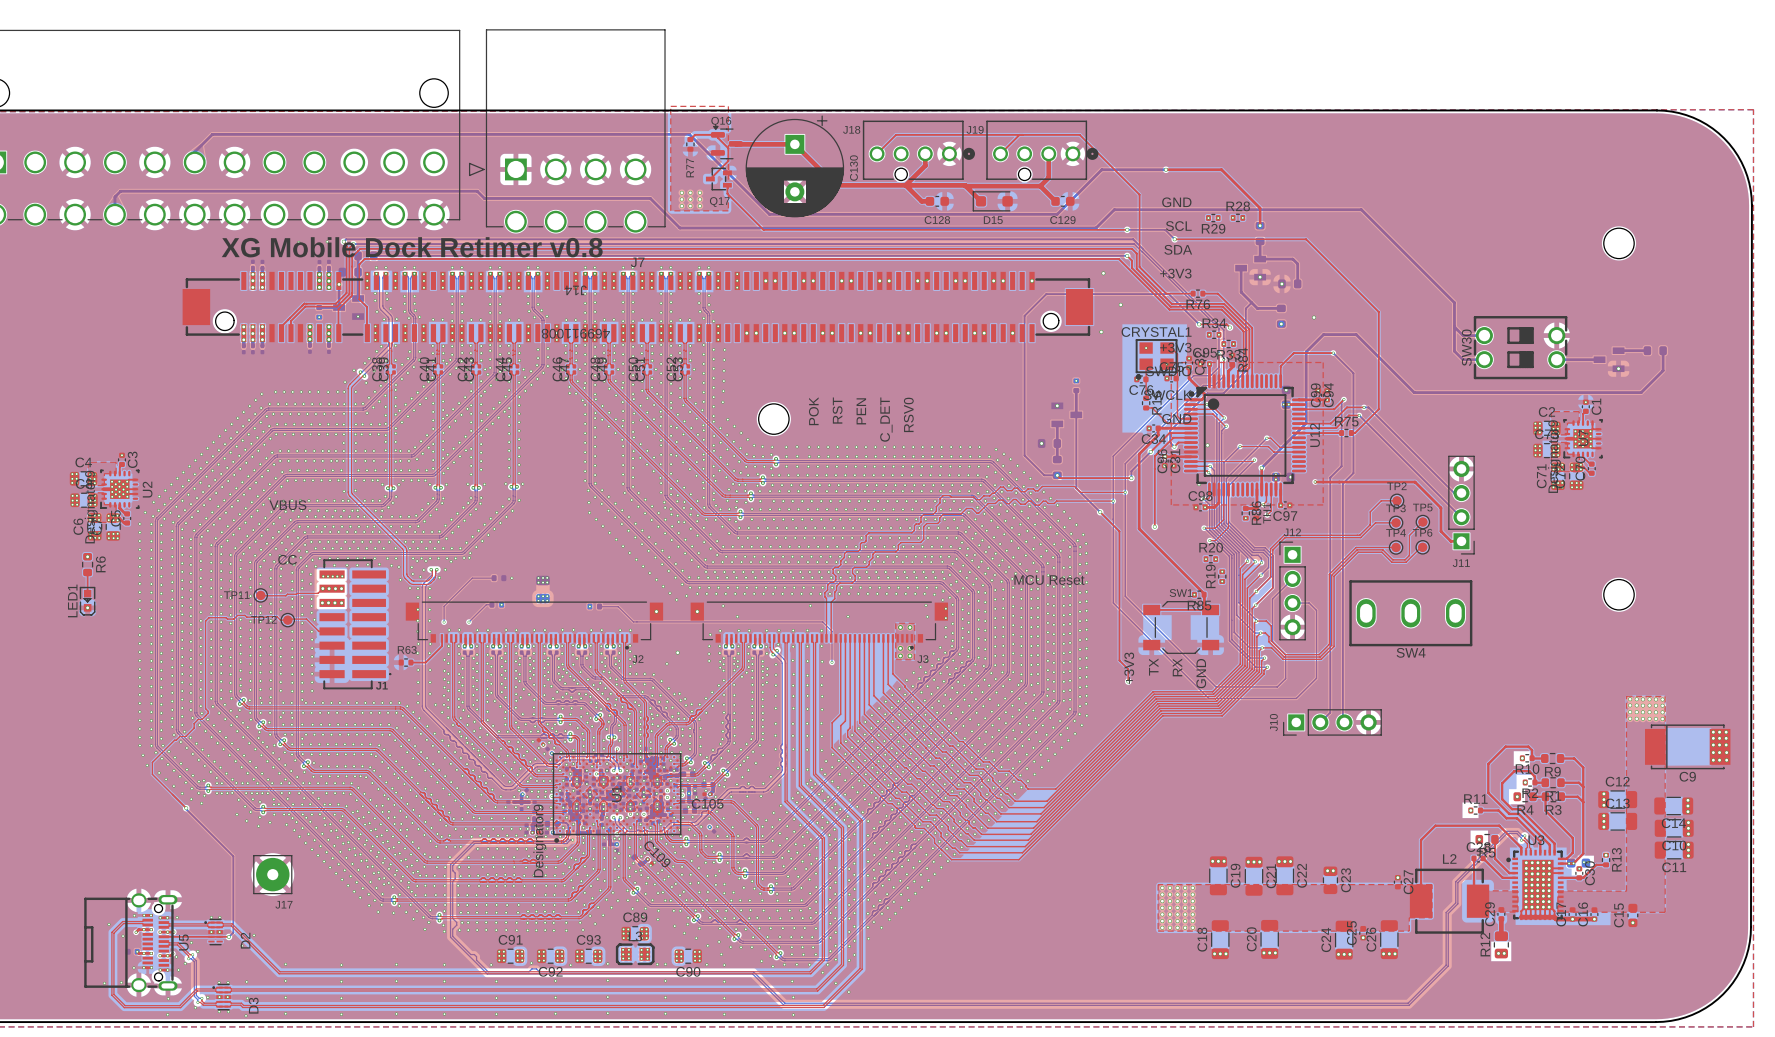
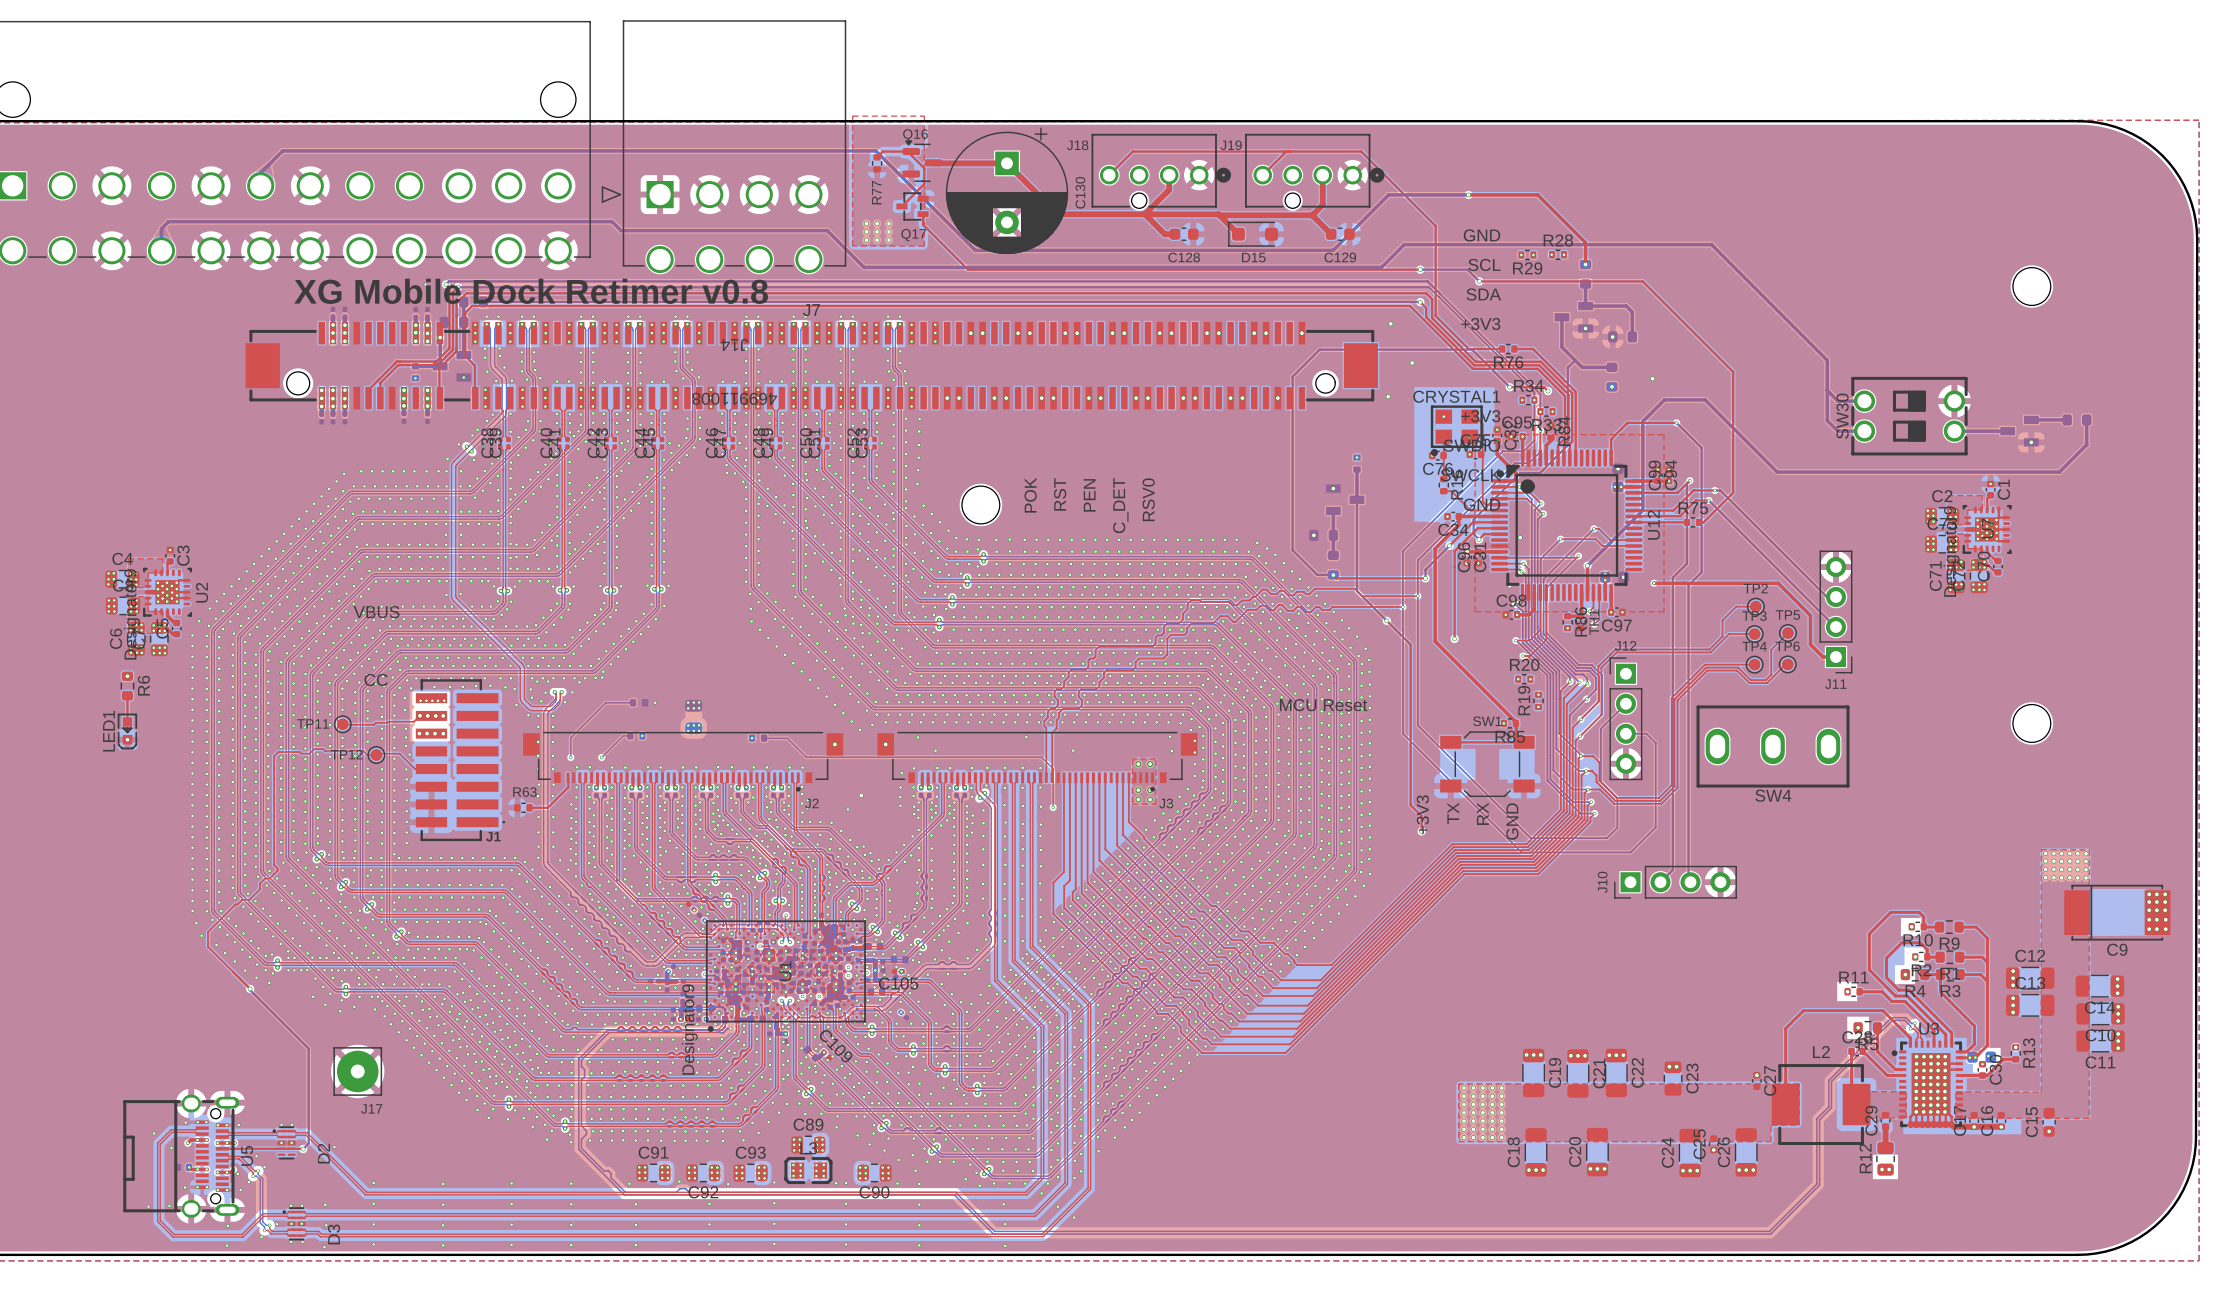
bottom track: (713, 784) (713, 791) (710, 794) -> none

